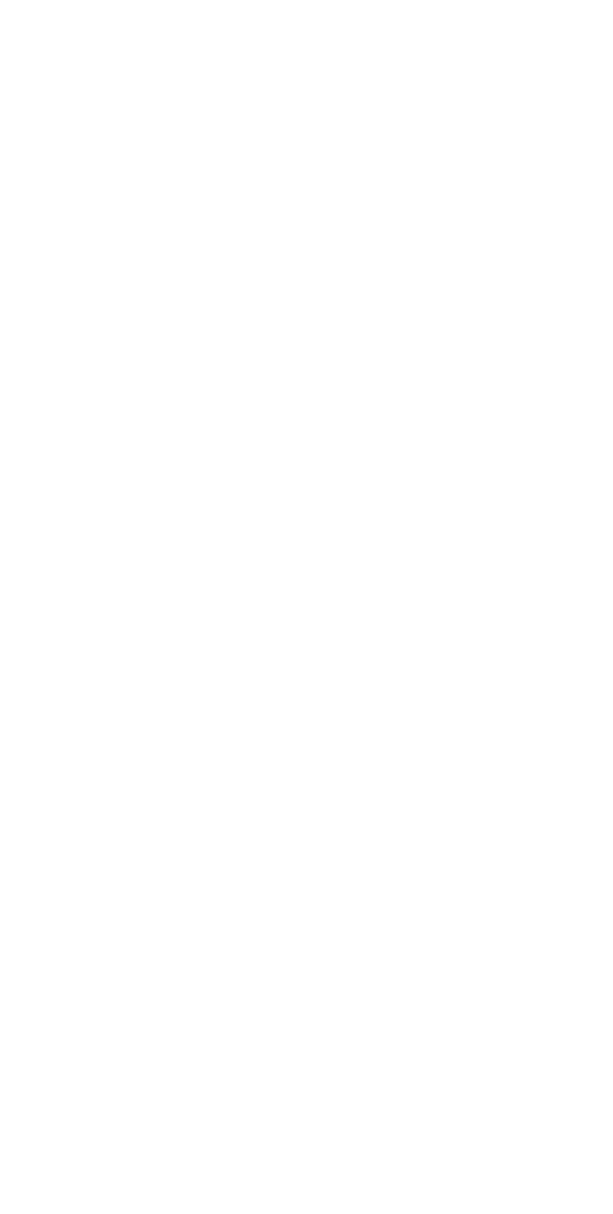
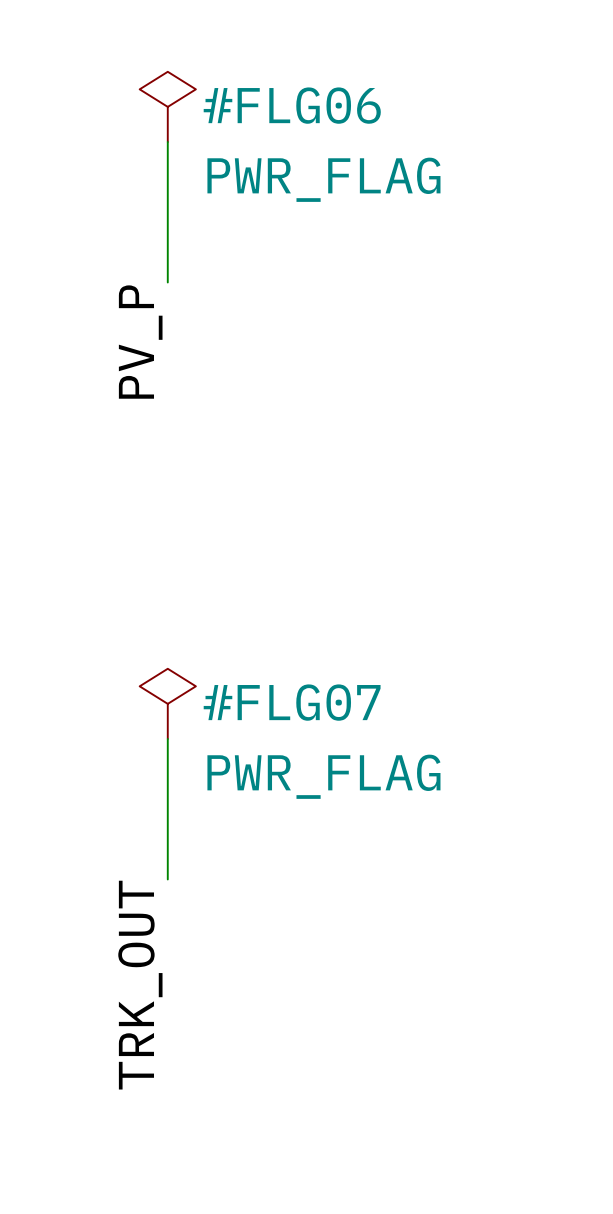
#FLG06: none -> PWR_FLAG (167, 106)
wire: none -> (167, 142) (167, 282)
label: none -> PV_P (140, 342)
#FLG07: none -> PWR_FLAG (167, 703)
wire: none -> (167, 739) (167, 879)
label: none -> TRK_OUT (140, 985)

